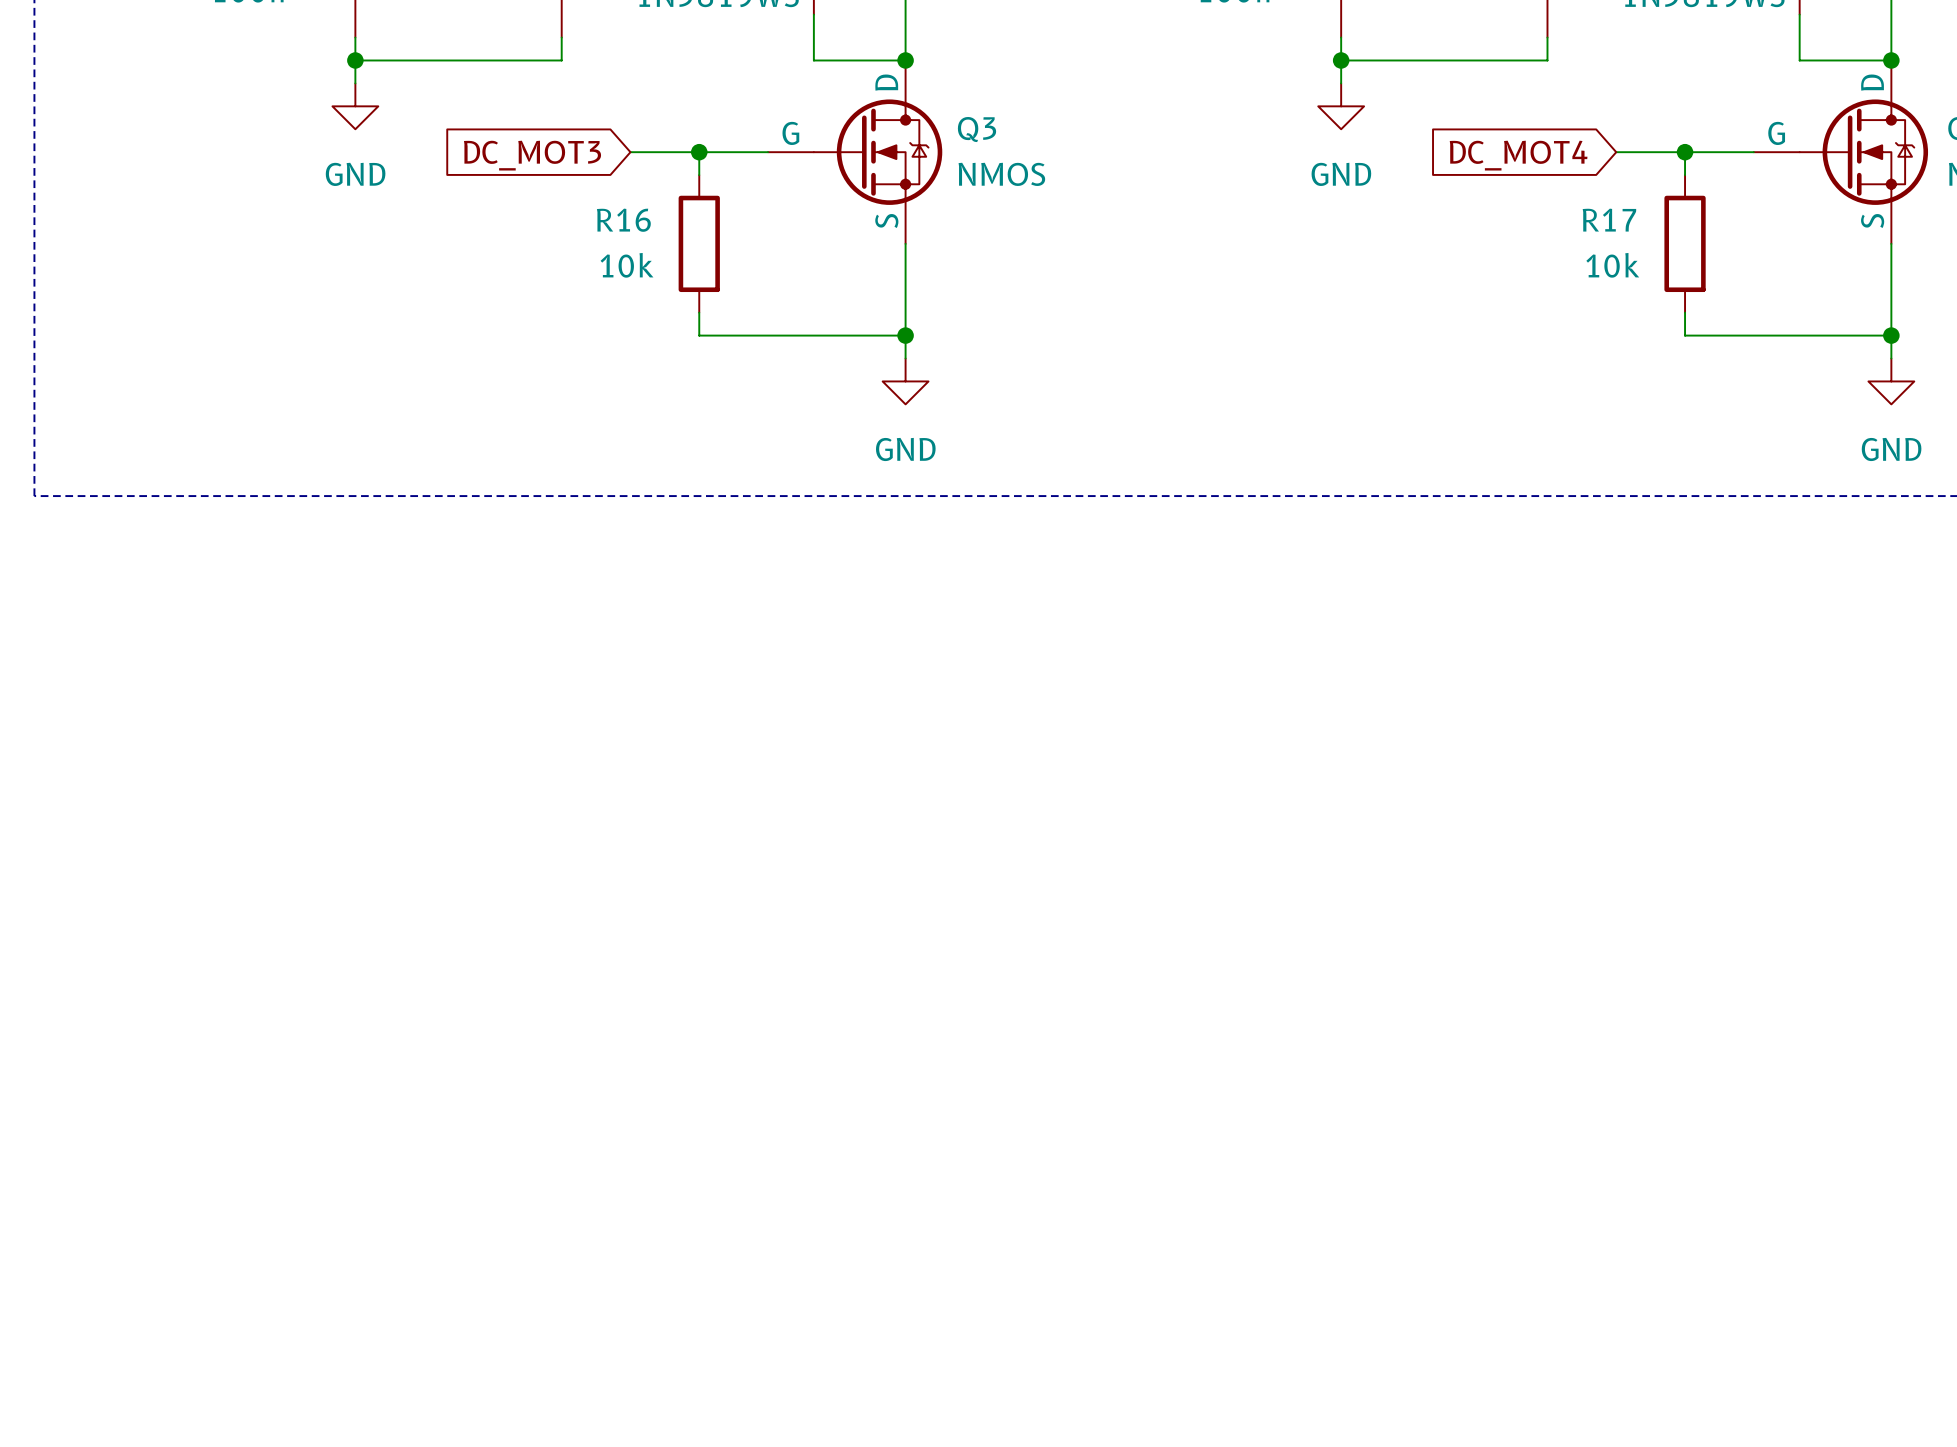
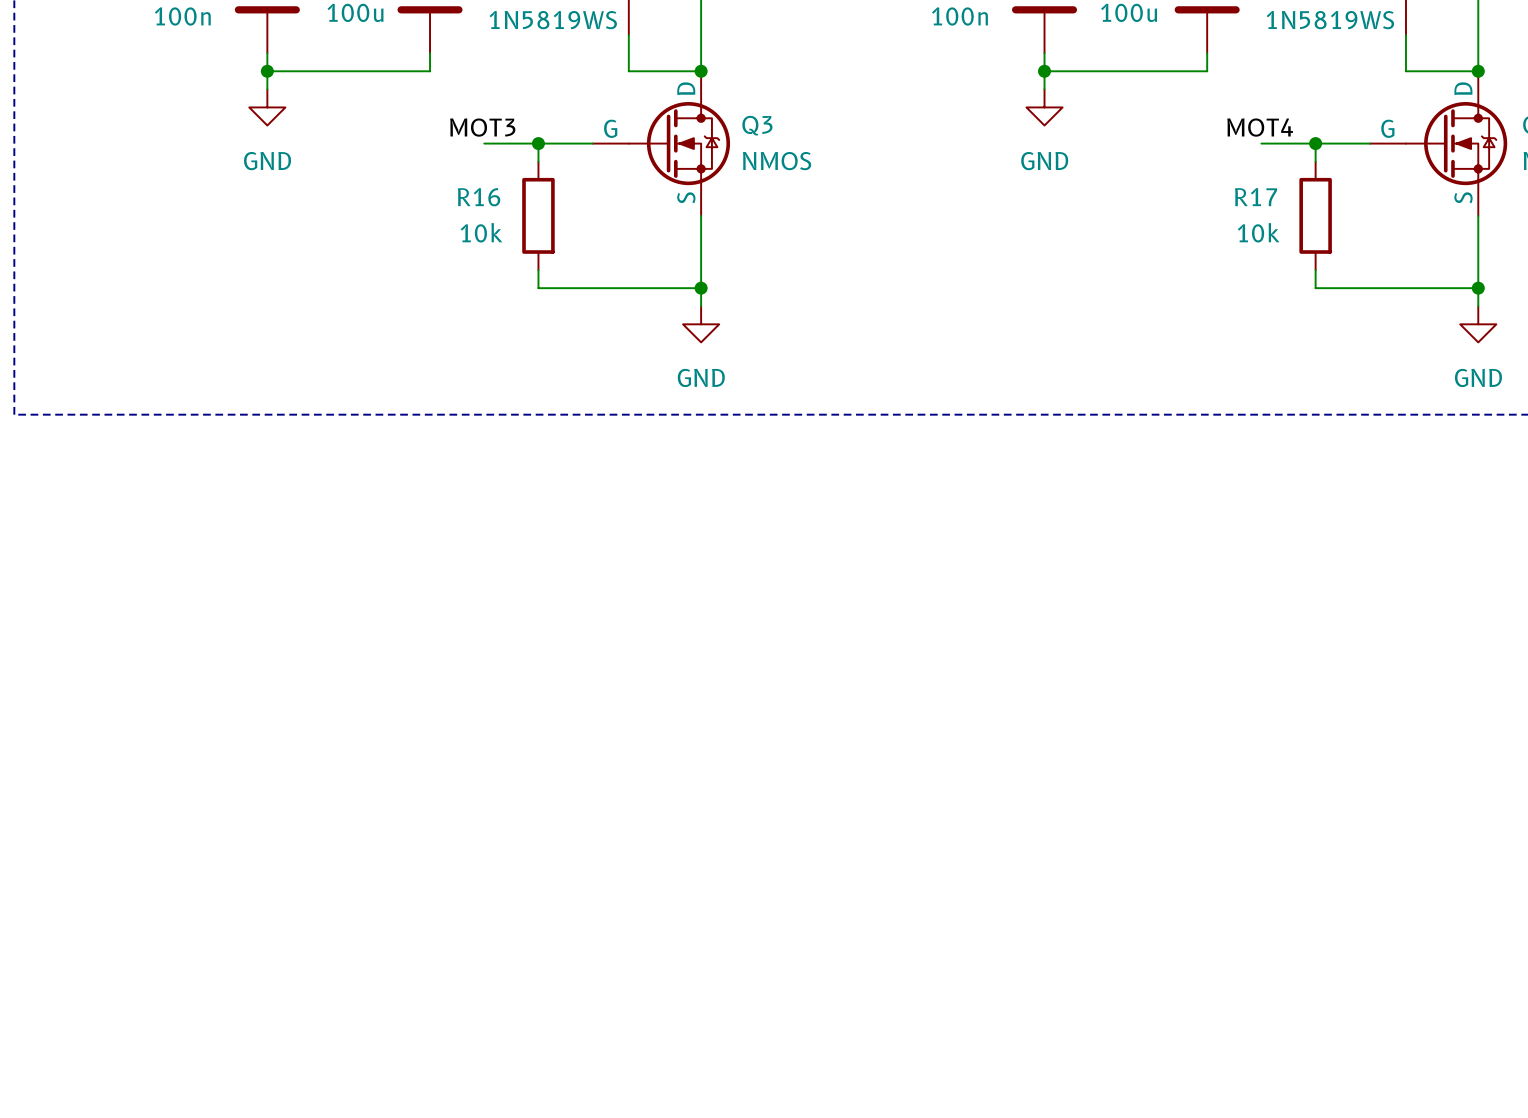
label: none -> MOT3 (482, 127)
label: none -> MOT4 (1260, 127)
global label: DC_MOT3 (532, 155) -> none
global label: DC_MOT4 (1518, 155) -> none

